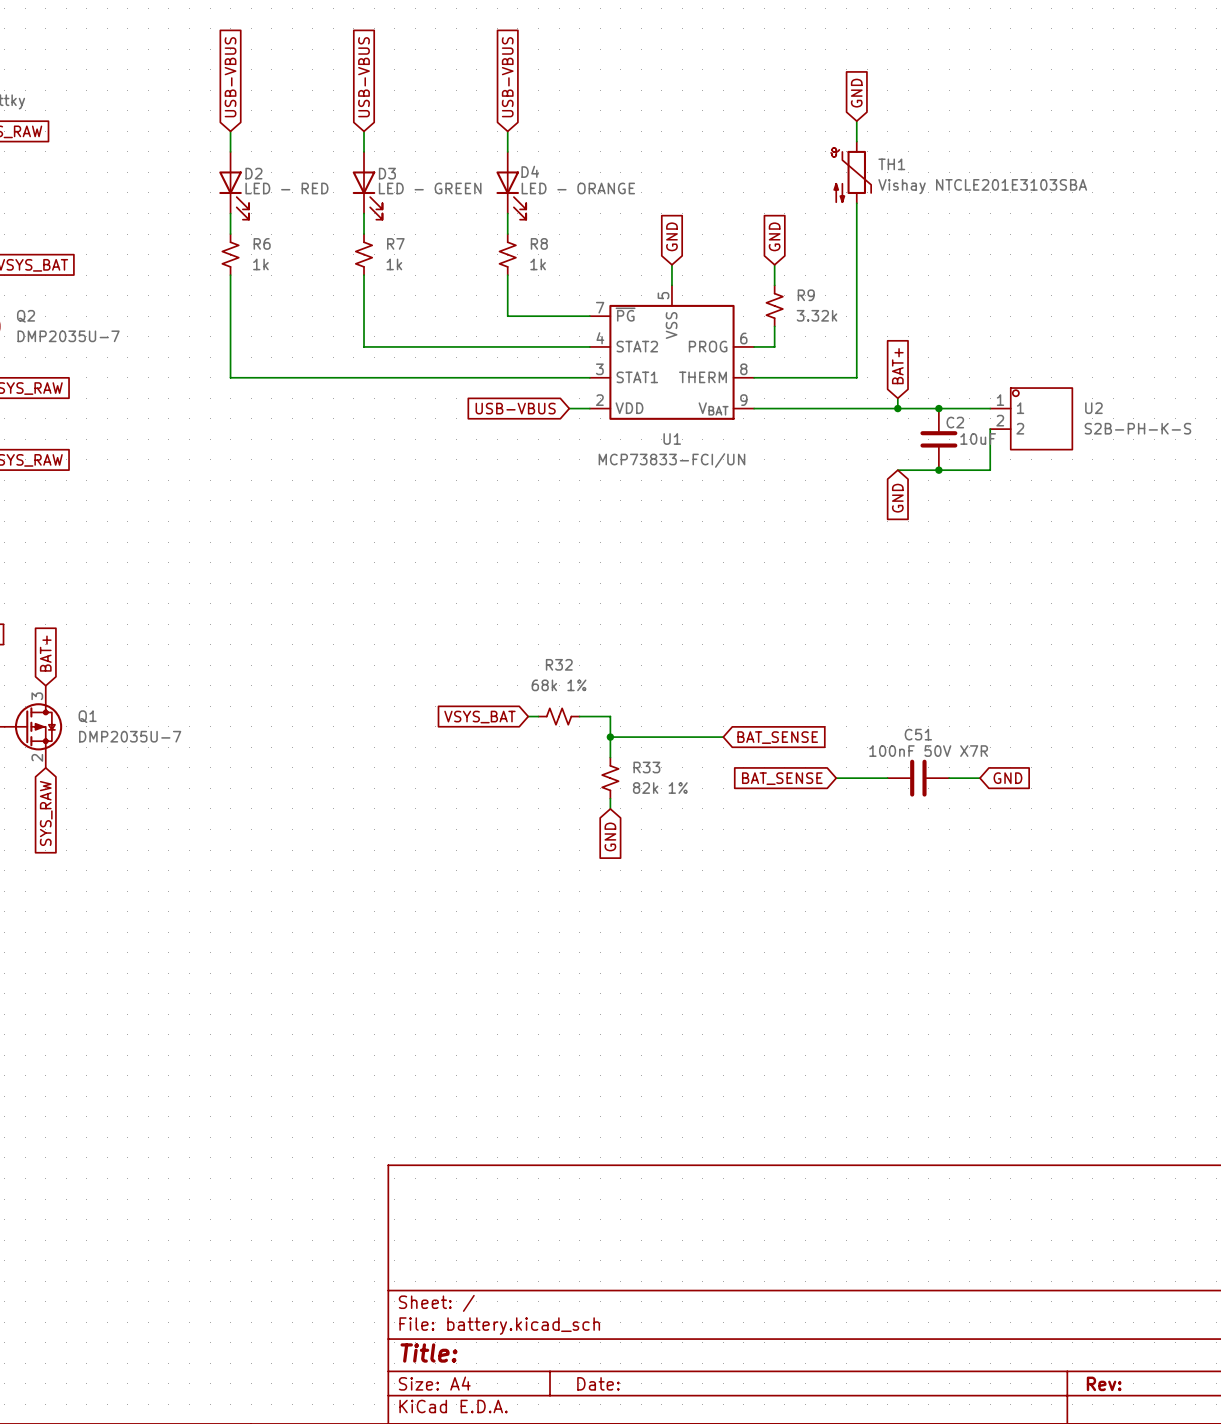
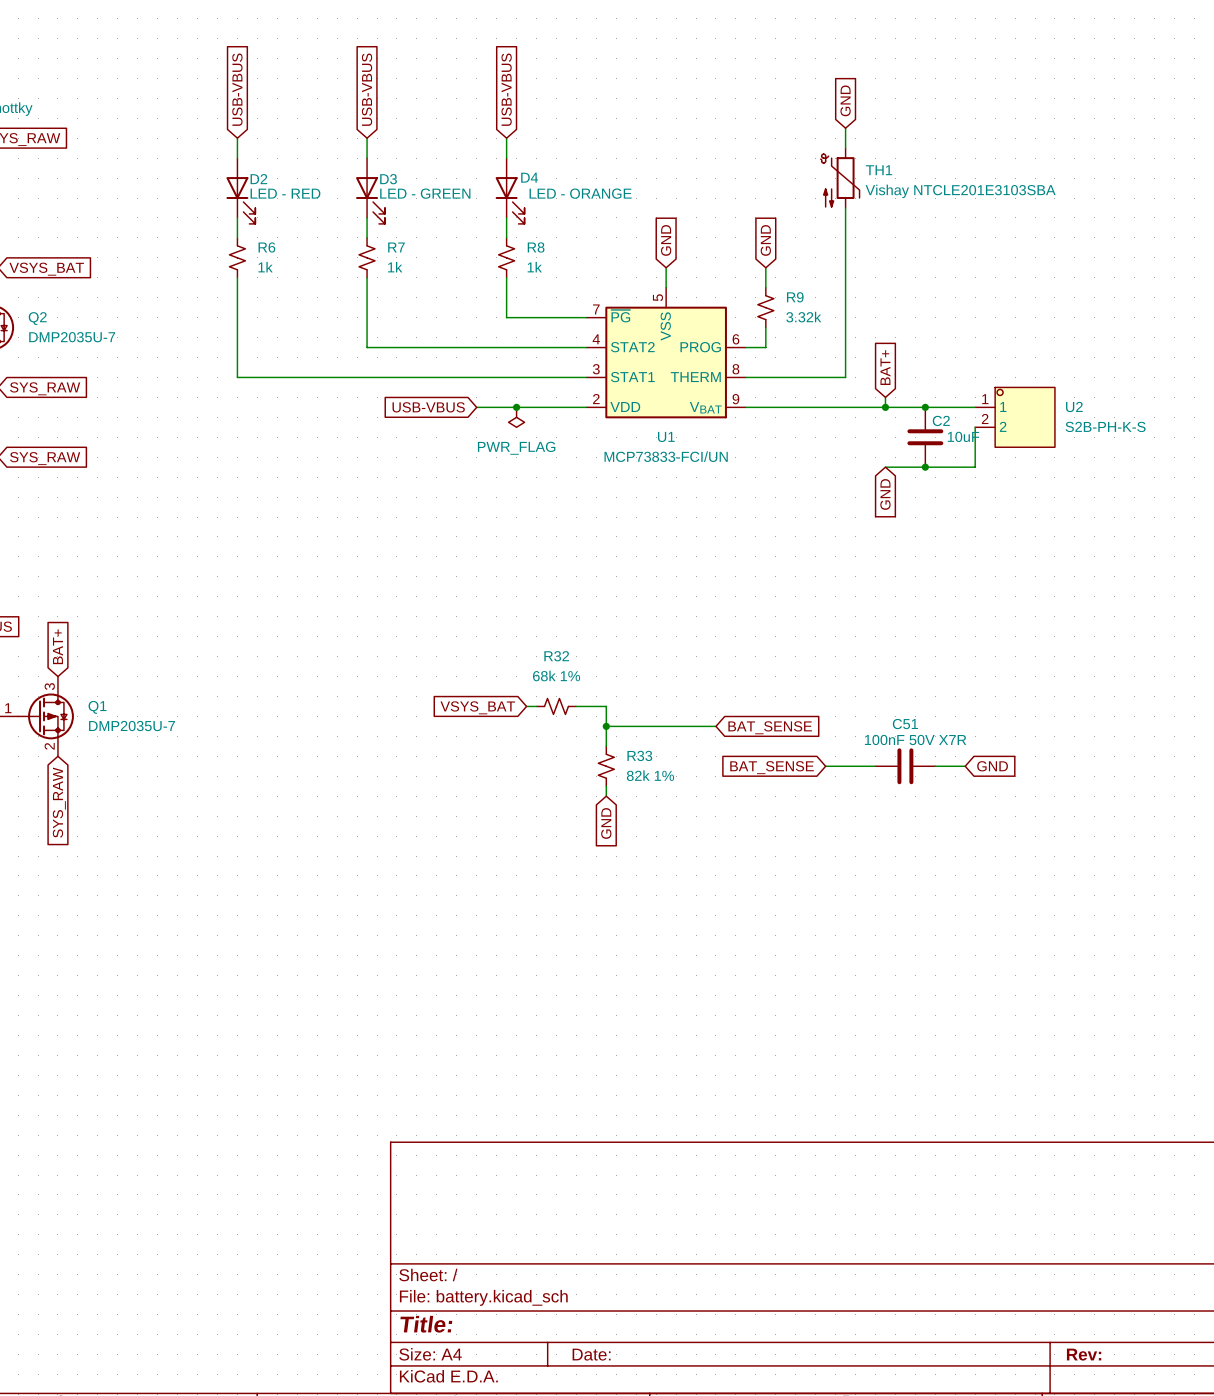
wire: none -> (476, 407) (566, 407)
global label position: USB-VBUS (515, 408) -> USB-VBUS (428, 407)
junction: none -> (516, 407)
power symbol: none -> PWR_FLAG (516, 417)

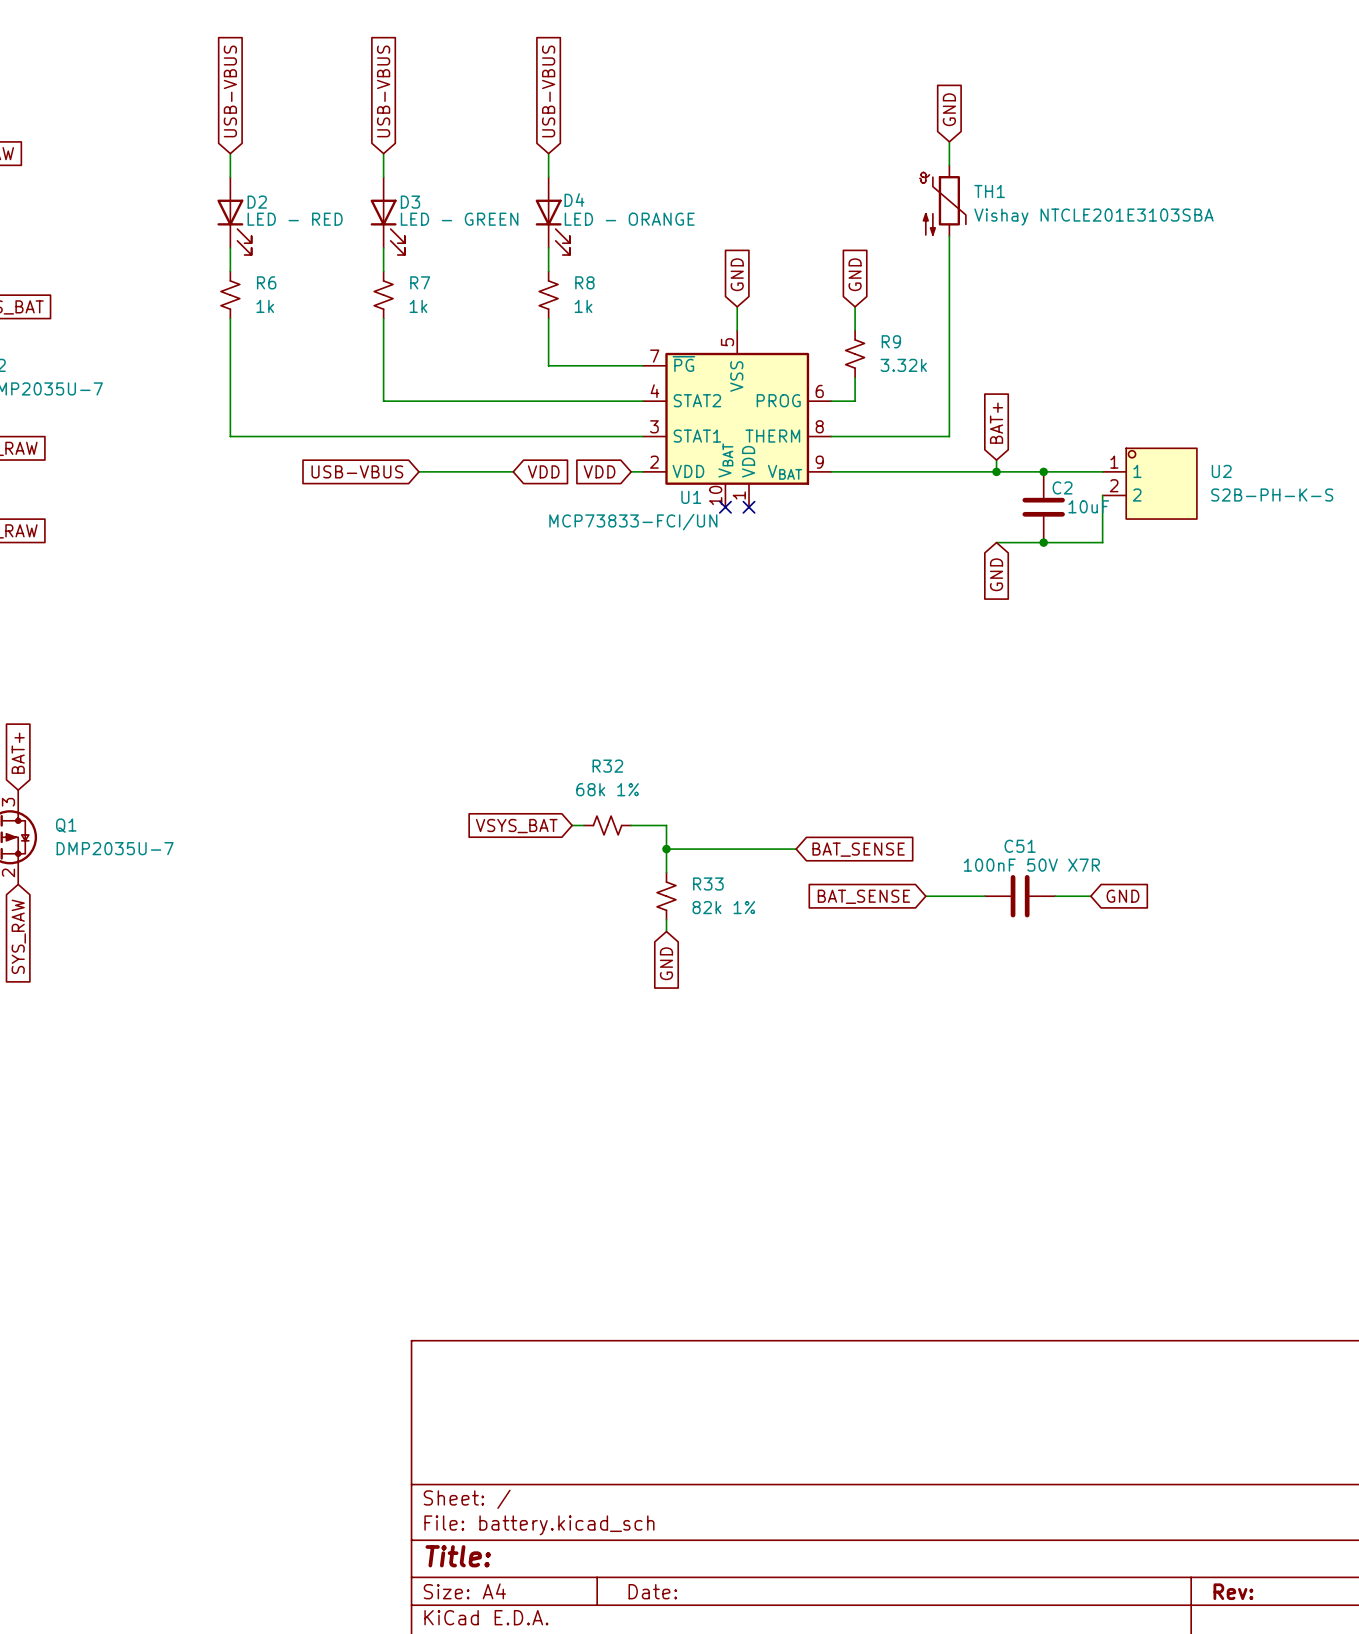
U1 symbol: [586, 287, 746, 419] -> [642, 330, 832, 508]
global label: none -> USB-VBUS (357, 471)
global label: USB-VBUS (428, 407) -> VDD (543, 471)
wire: (476, 407) (576, 407) -> (513, 471) (418, 471)
junction: (516, 407) -> none
global label: none -> VDD (599, 471)
power symbol: PWR_FLAG (516, 417) -> none
U1 name position: U1 (666, 436) -> U1 (691, 497)
no-connect mark: none -> (725, 507)
no-connect mark: none -> (749, 507)
U1 value position: MCP73833-FCI/UN (666, 456) -> MCP73833-FCI/UN (633, 522)

